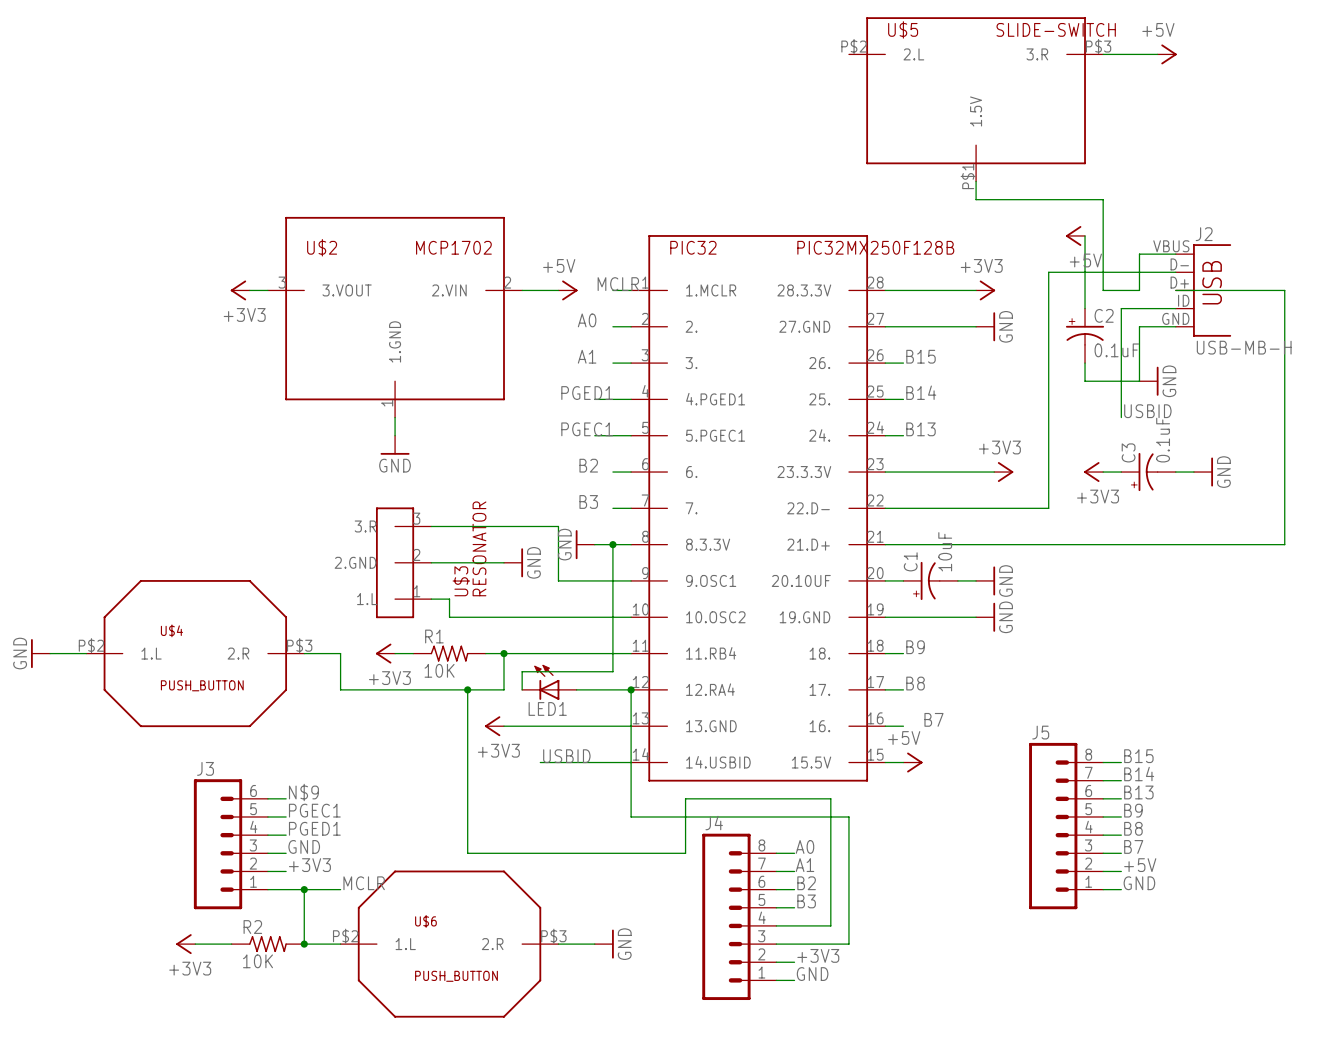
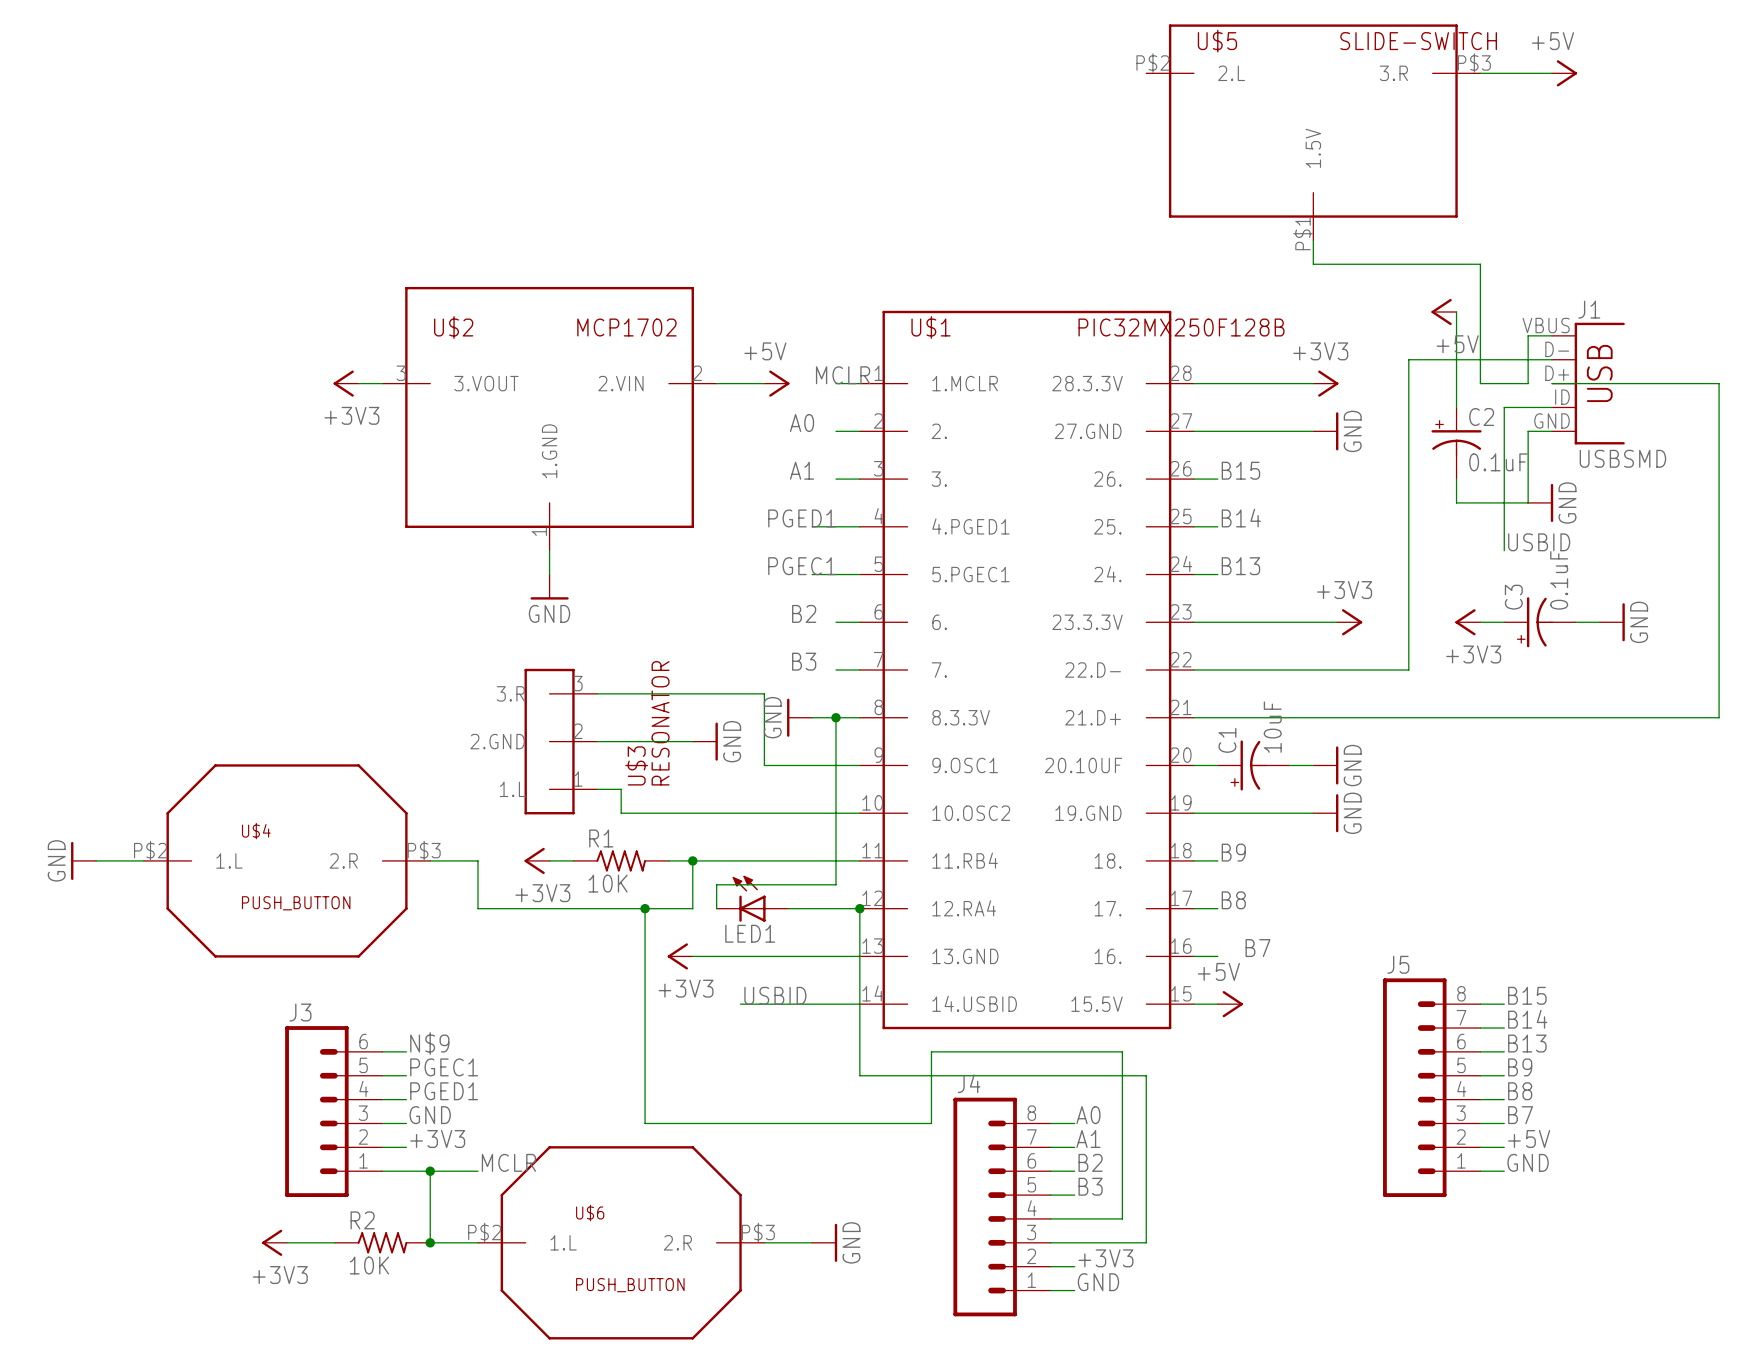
PIC32 name: PIC32 (693, 247) -> U$1 (931, 327)
J1: none -> USBSMD (1588, 383)
J2: USB-MB-H (1203, 290) -> none

